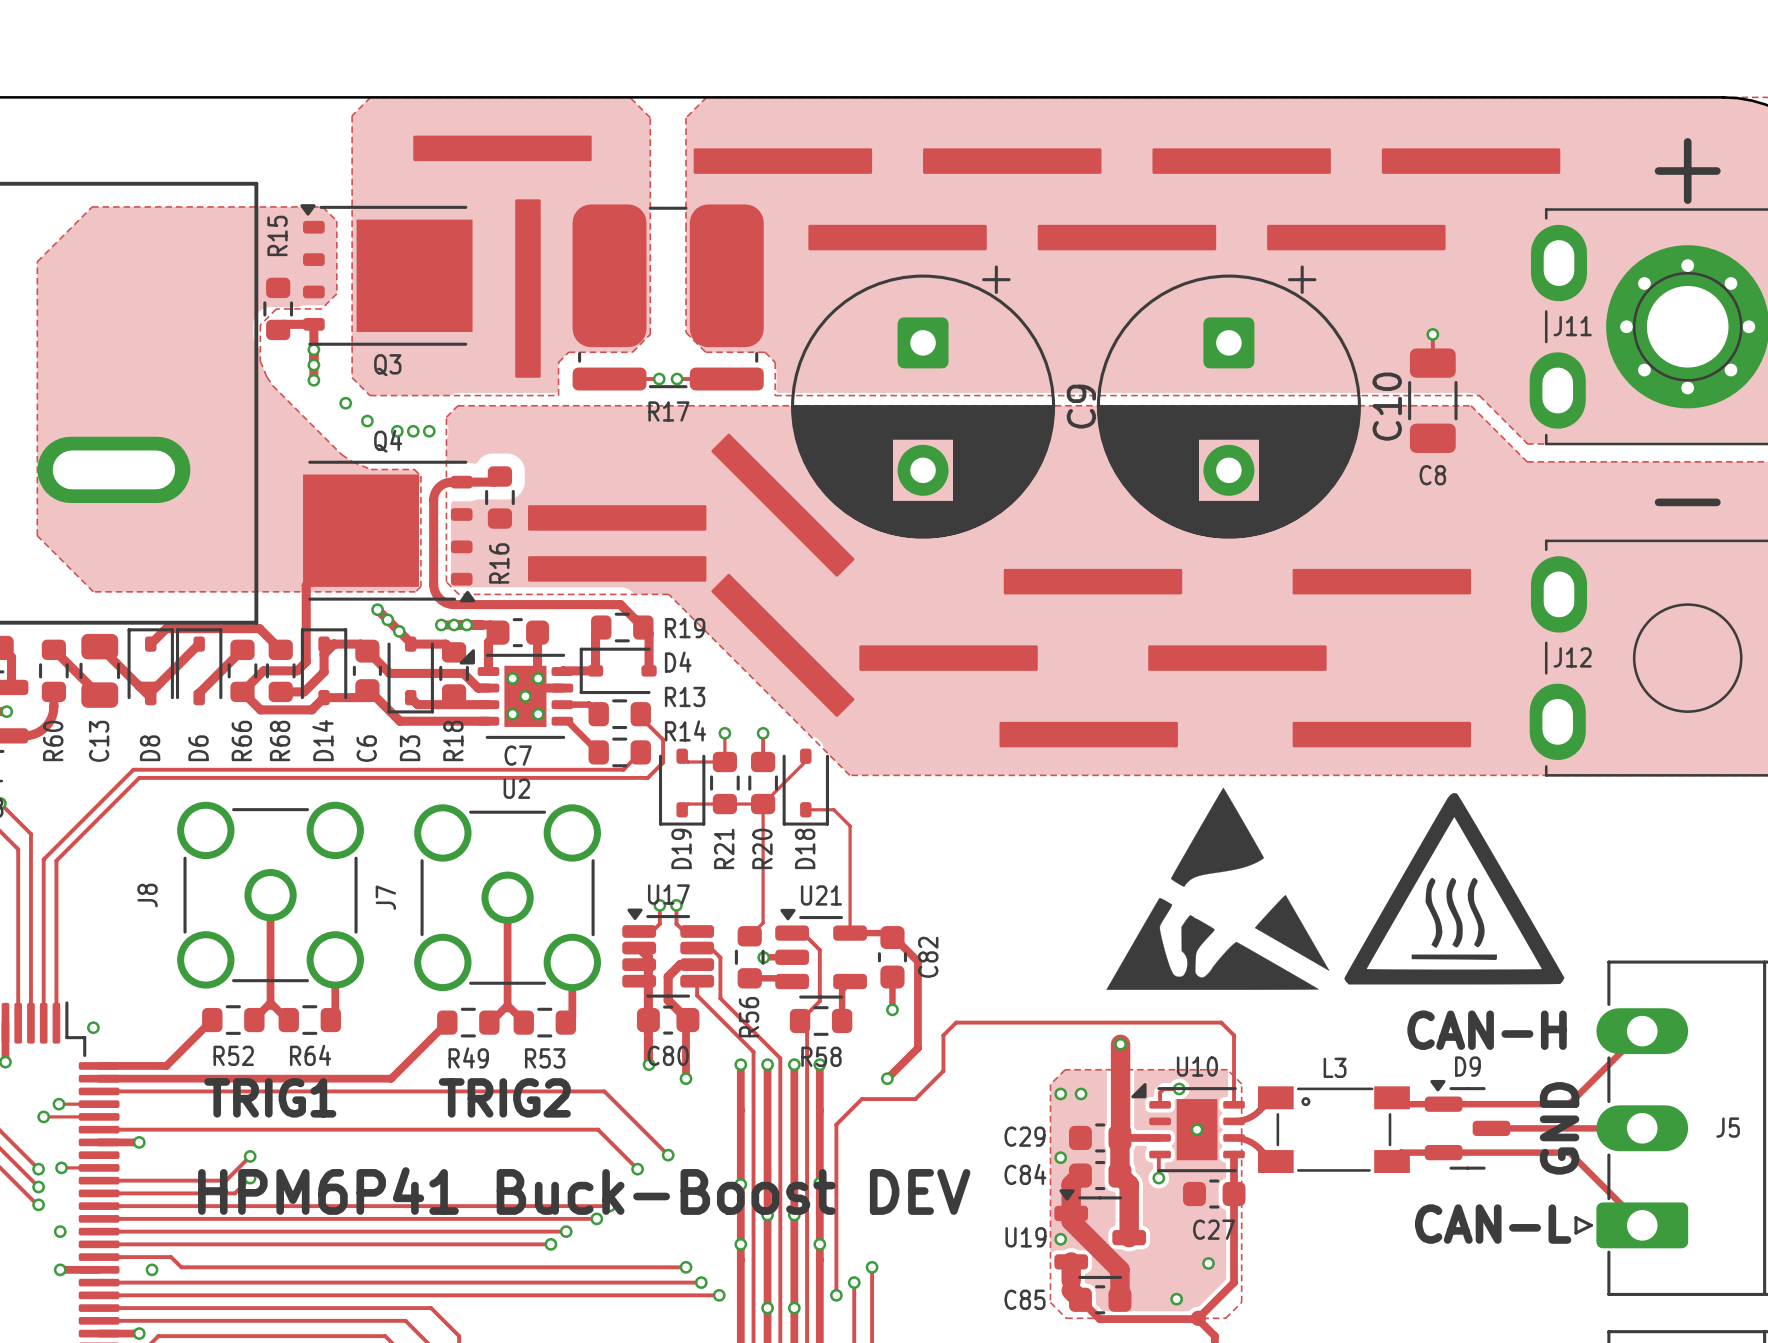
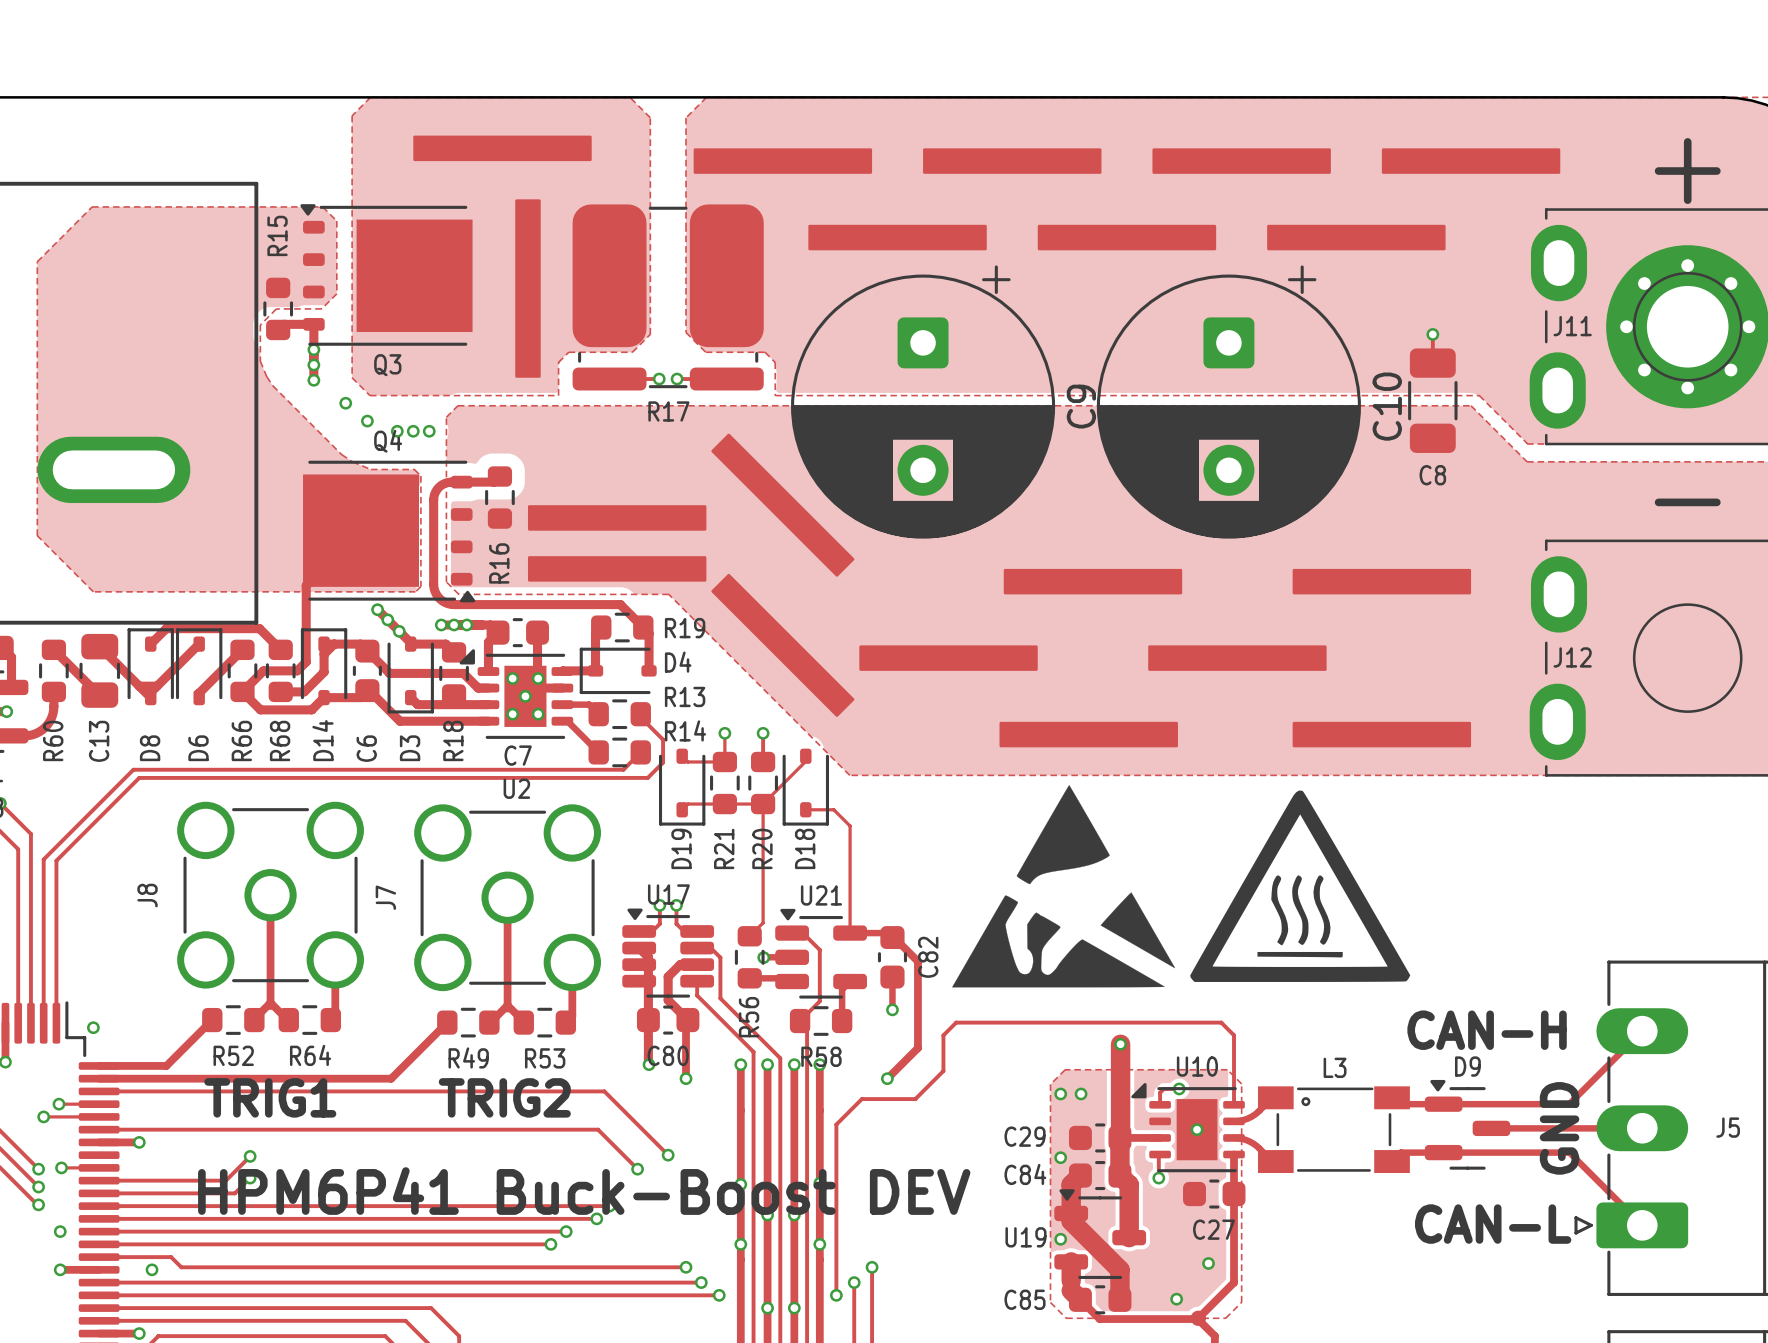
drawing position: (1217, 888) -> (1063, 886)
drawing position: (1454, 888) -> (1300, 886)

